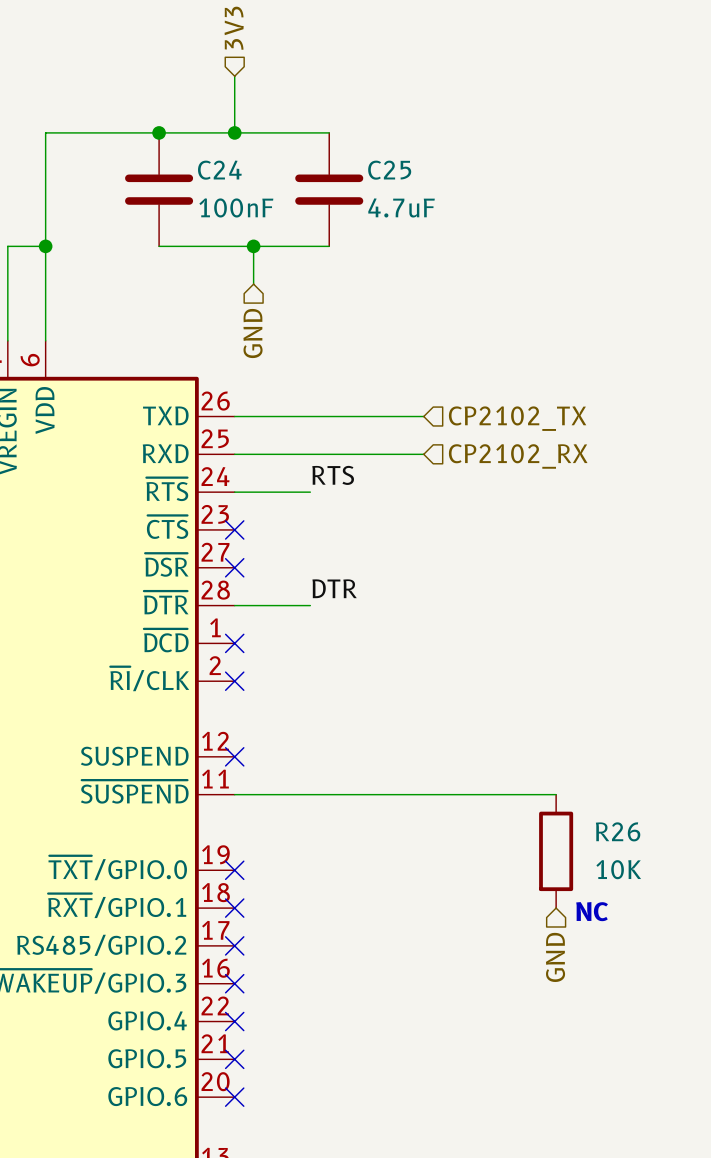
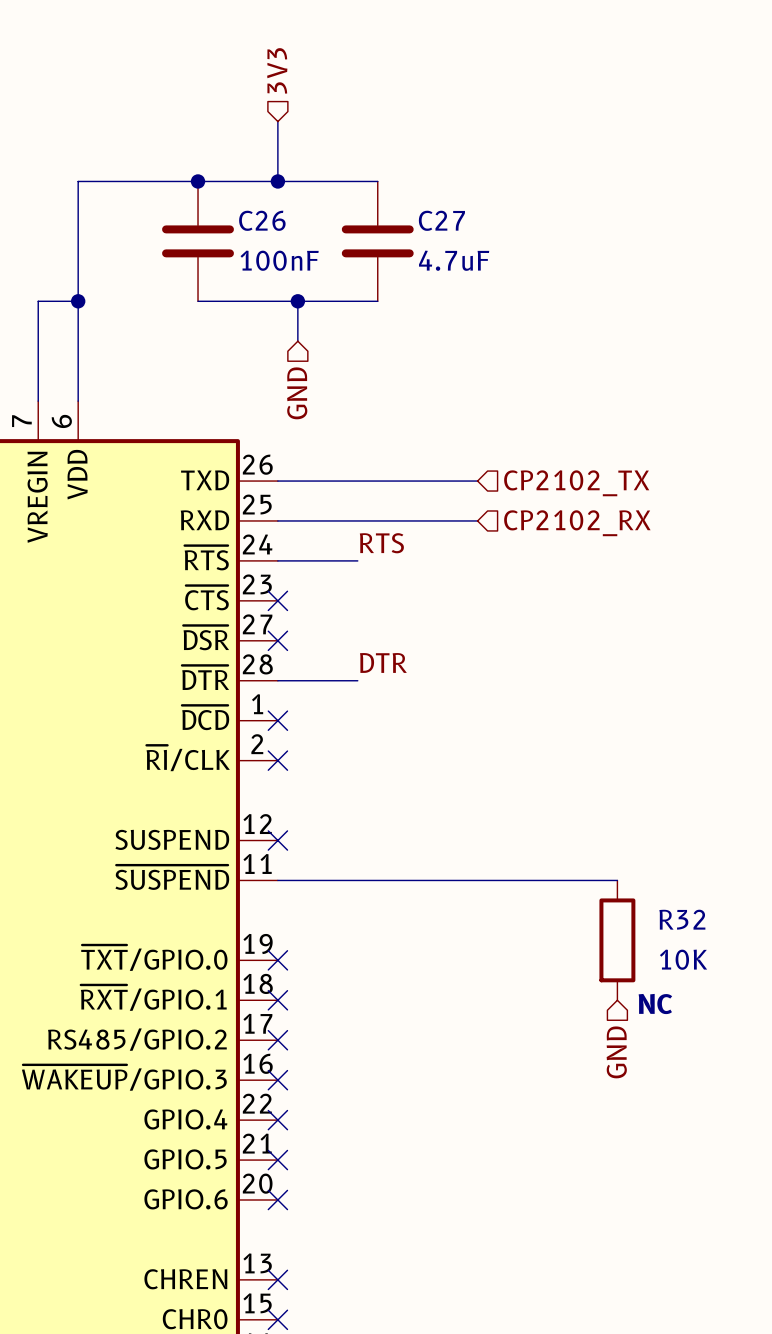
C24 name: C24 (219, 170) -> C26 (262, 220)
C25 name: C25 (389, 170) -> C27 (441, 220)
R26 name: R26 (618, 831) -> R32 (682, 919)

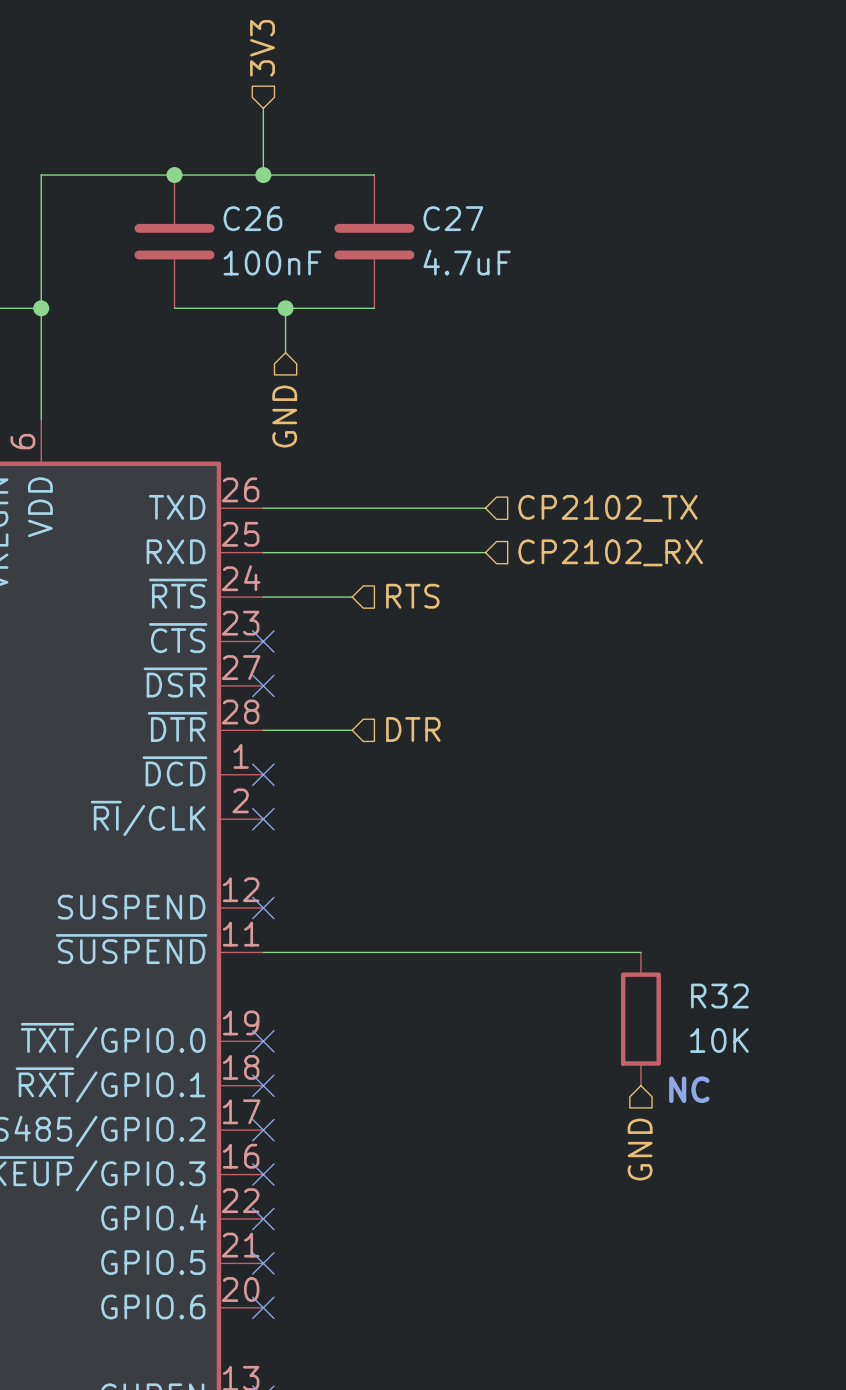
label: RTS (381, 543) -> none
hierarchical label: none -> RTS (412, 596)
label: DTR (383, 662) -> none
hierarchical label: none -> DTR (413, 729)

